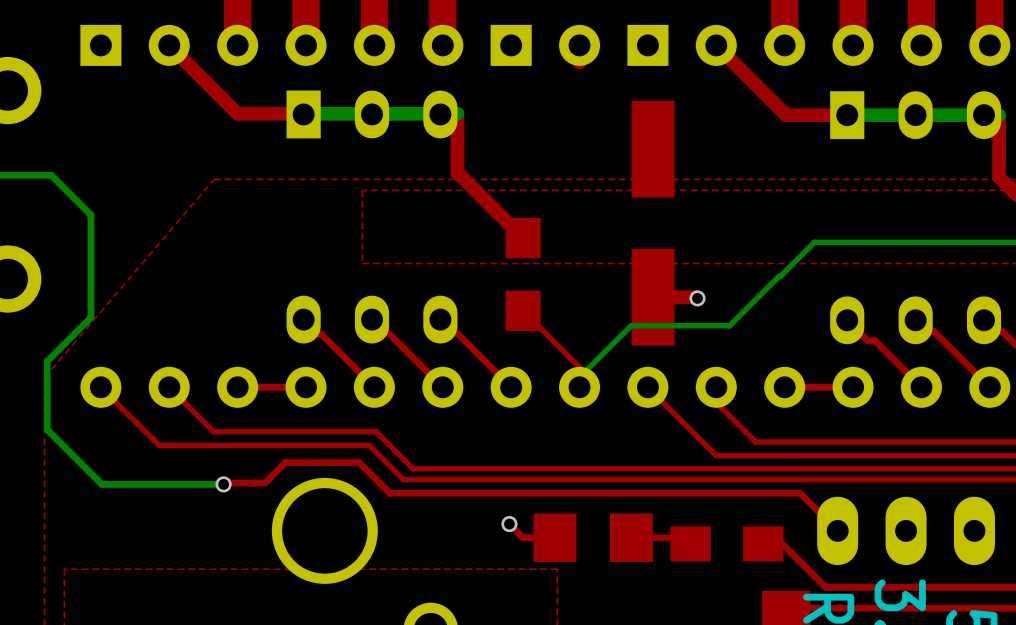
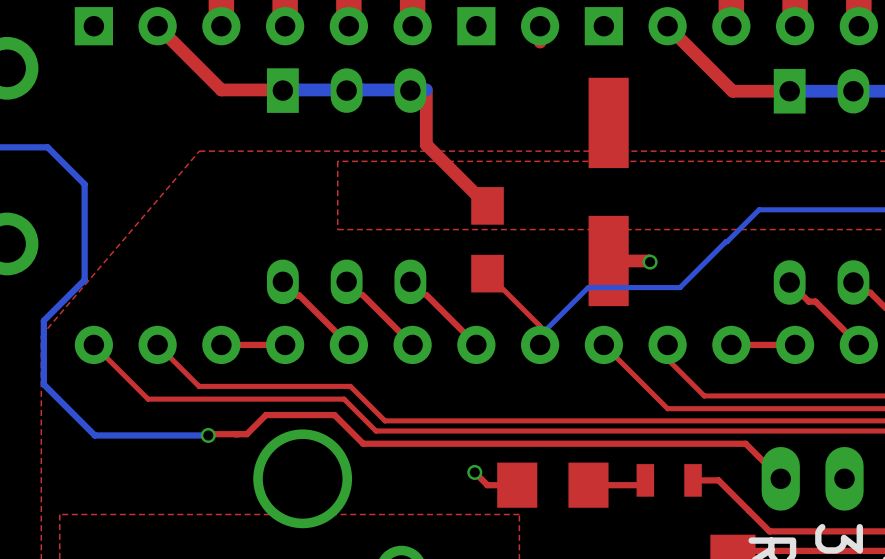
part footprint: [670, 526, 784, 562] -> [636, 464, 702, 497]
top track: none -> (718, 480) (693, 480)

